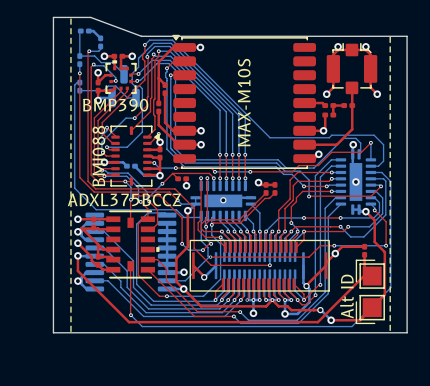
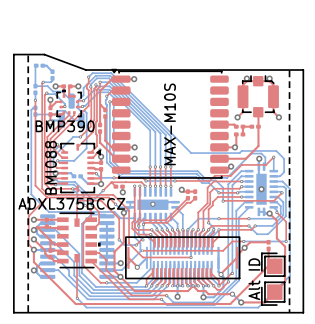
top track: none -> (47, 197) (28, 216) (28, 244) (33, 249)

